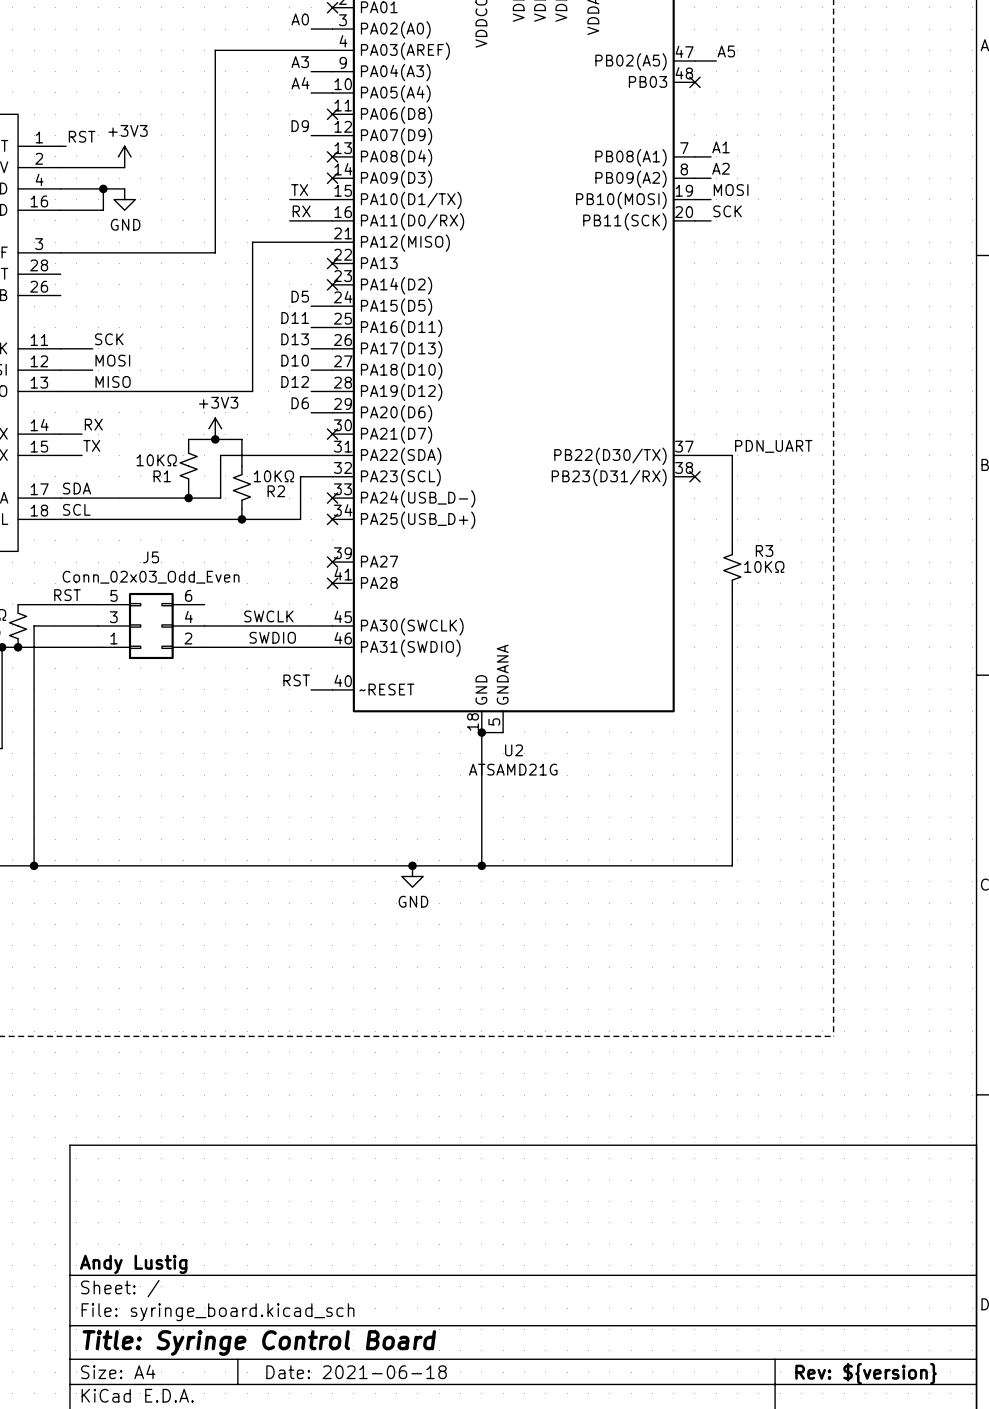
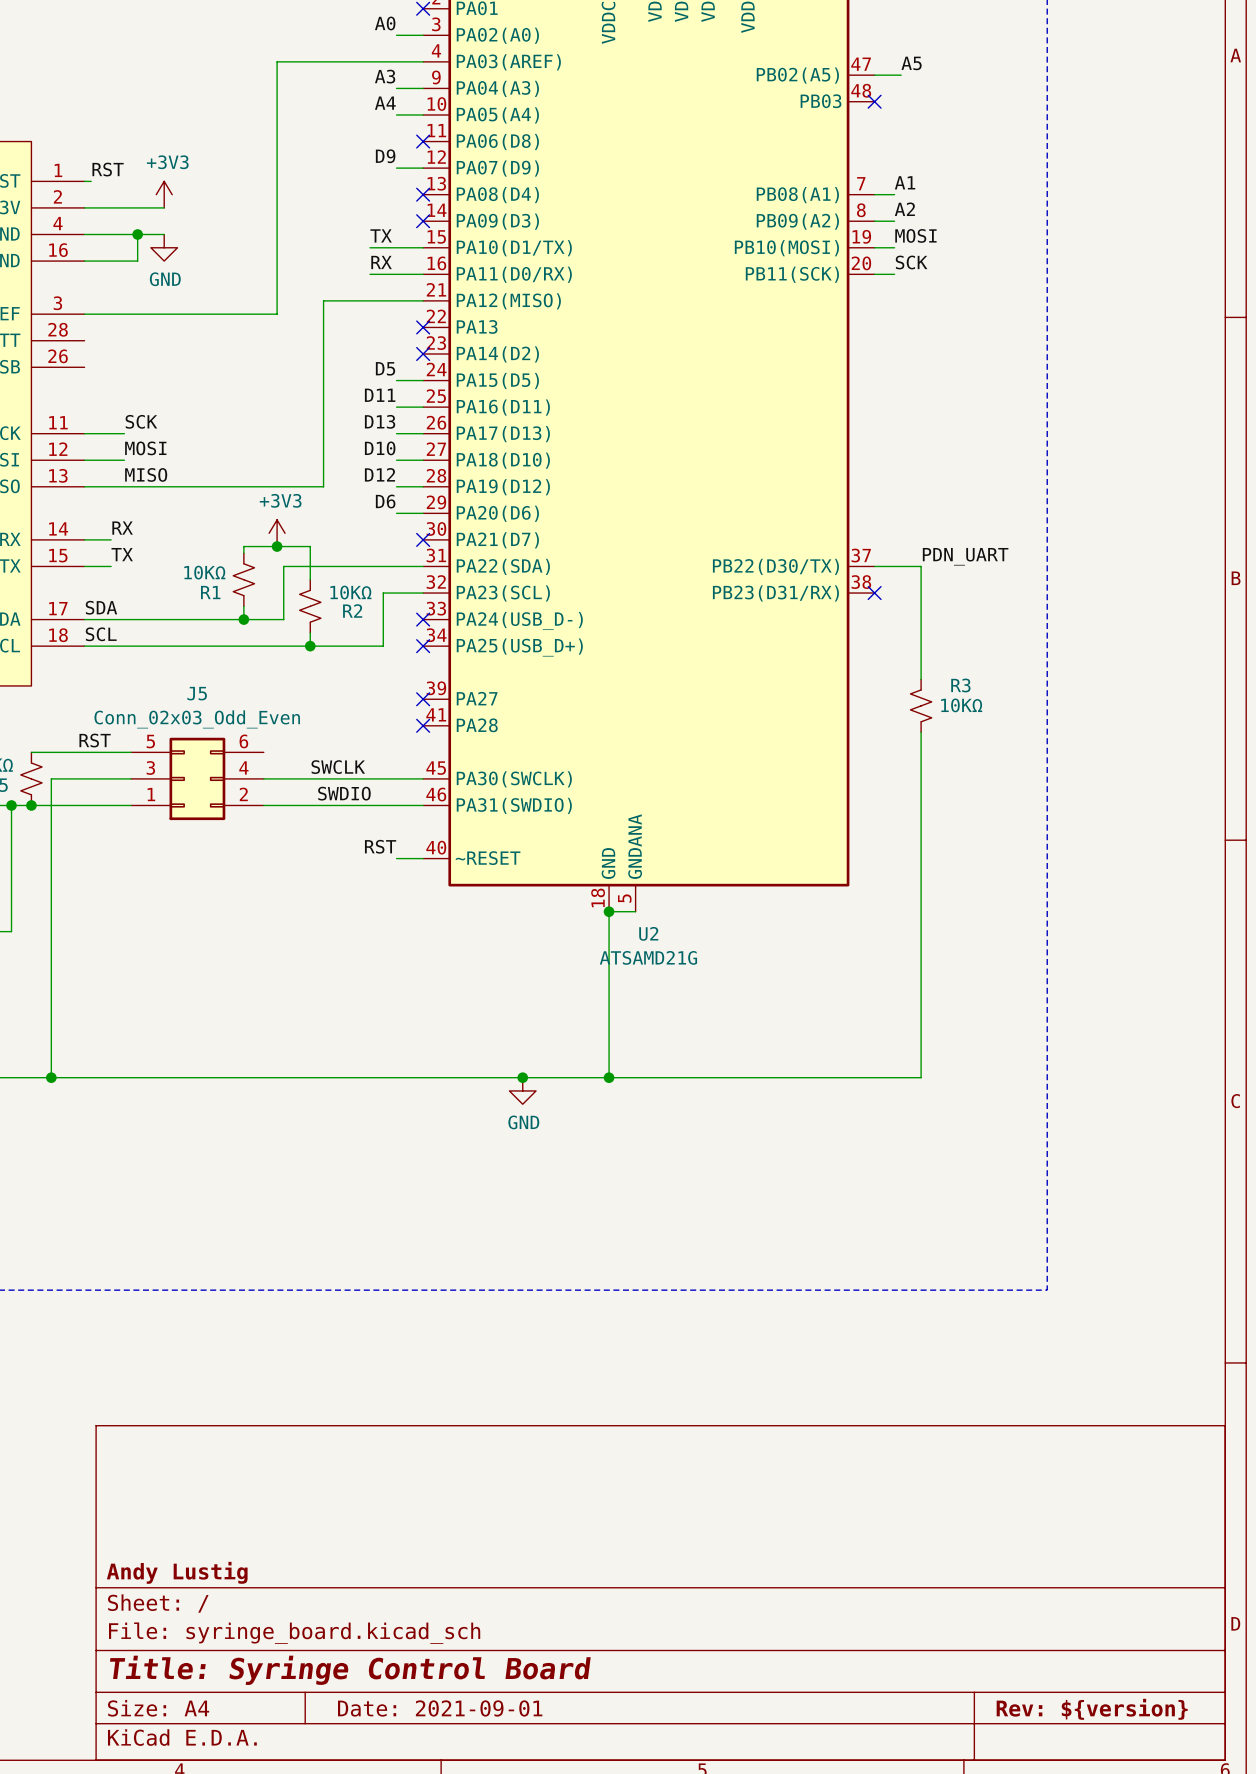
title block: Date: 2021-06-18 (356, 1372) -> Date: 2021-09-01 (440, 1708)

